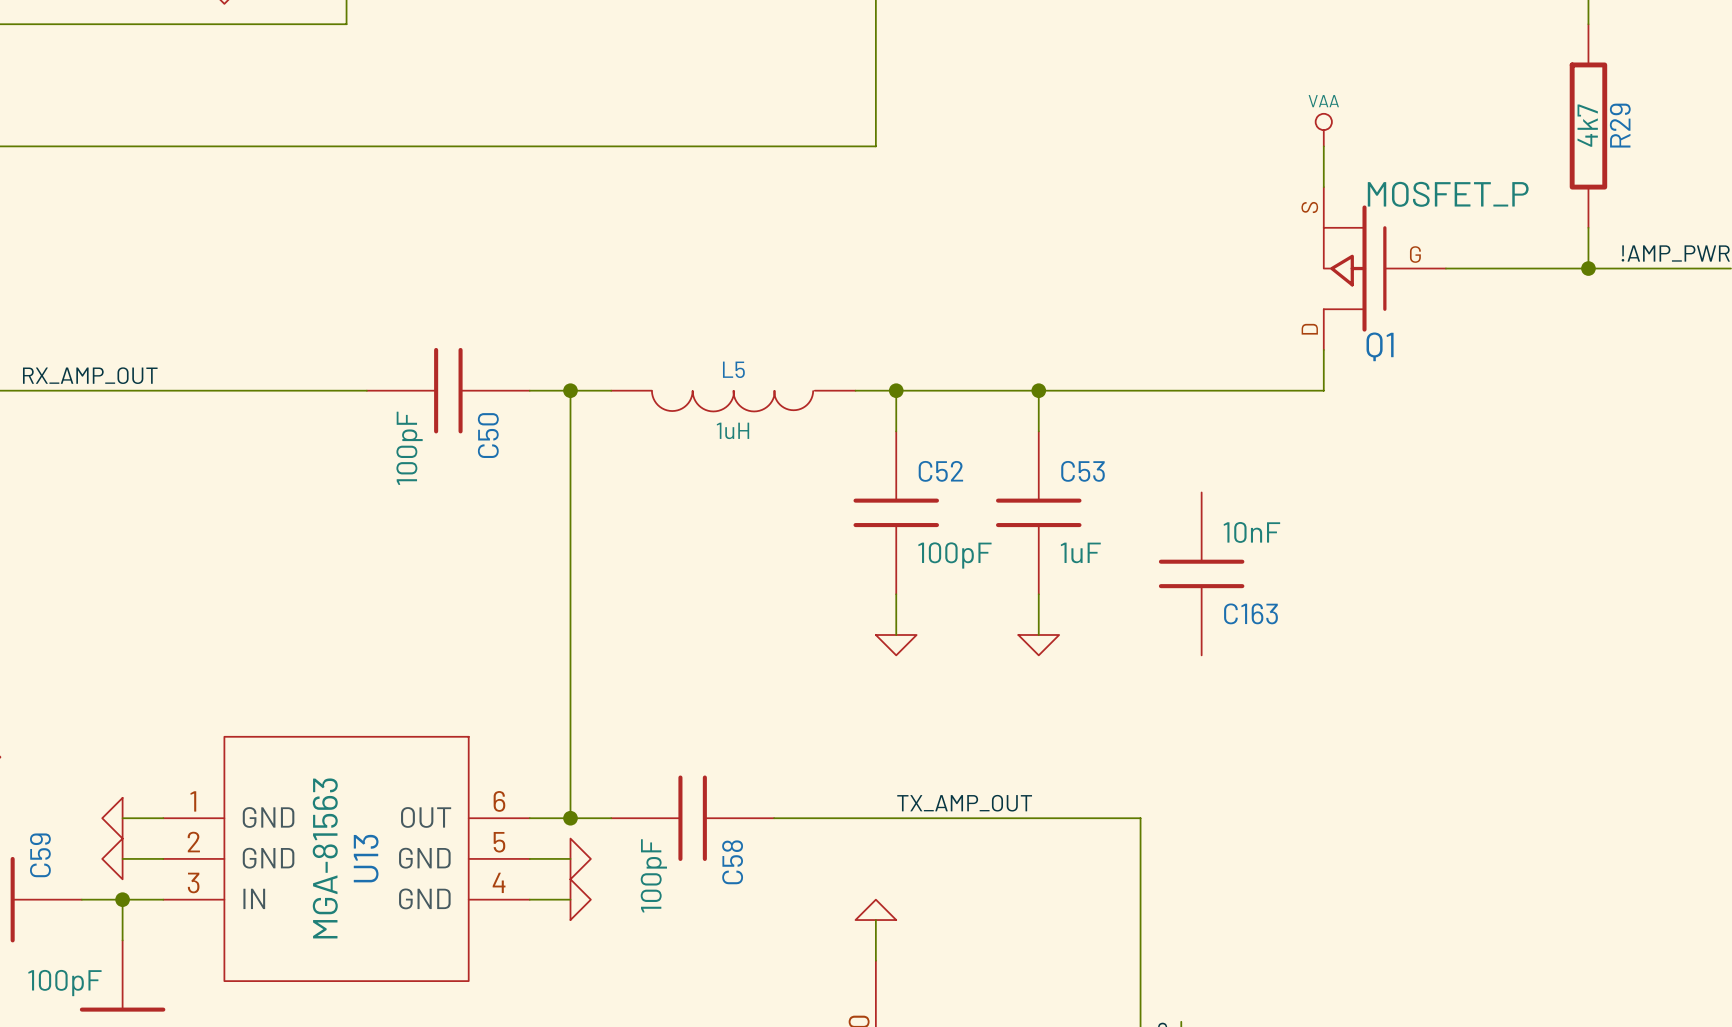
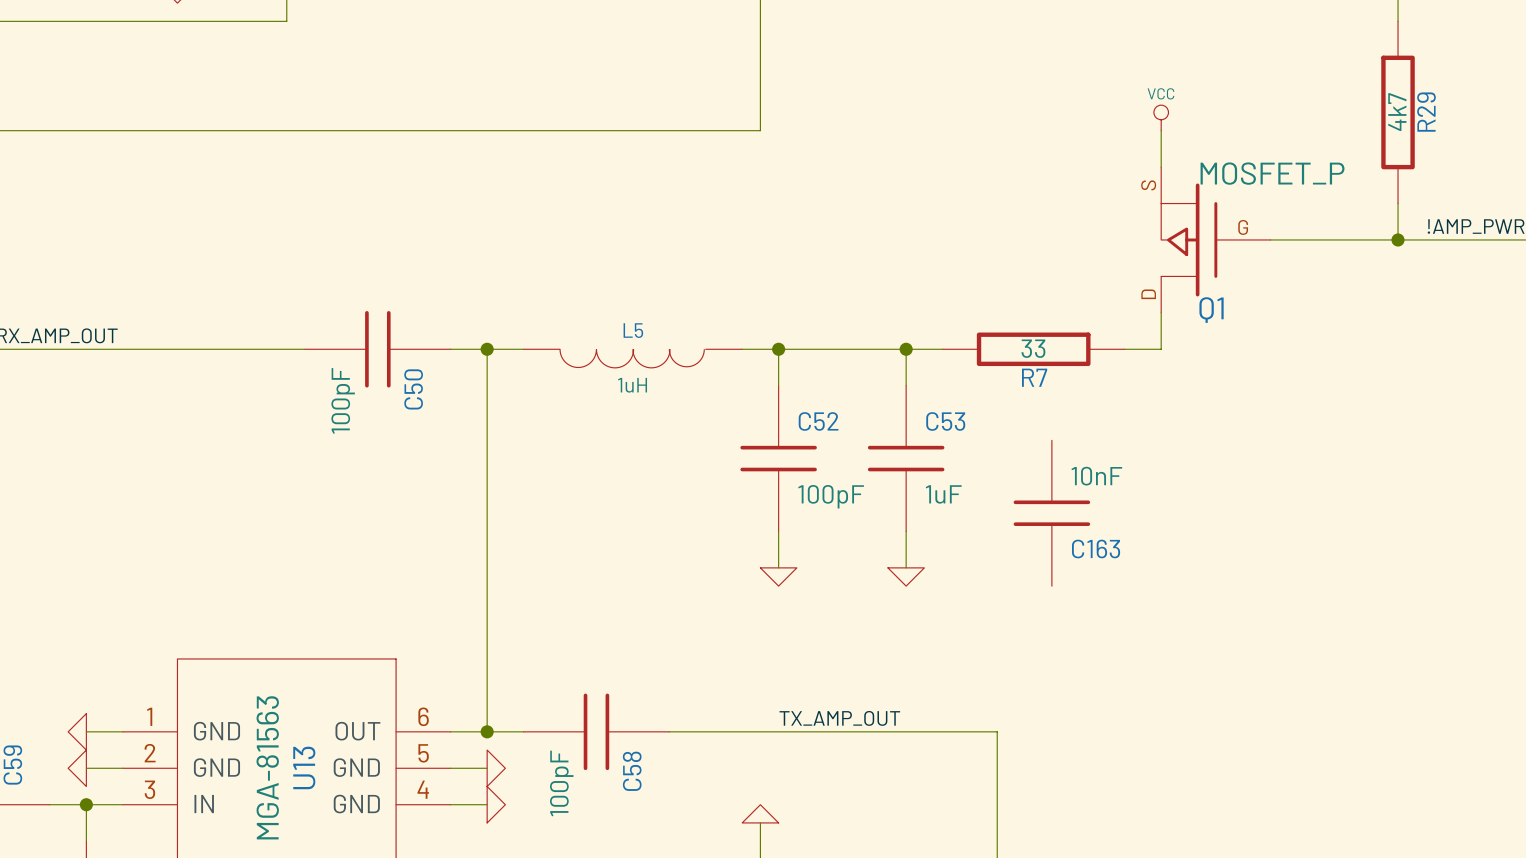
power symbol: VAA (1323, 130) -> VCC (1161, 117)
wire: (1079, 390) (1283, 390) -> none
R7: none -> 33 (1033, 349)

